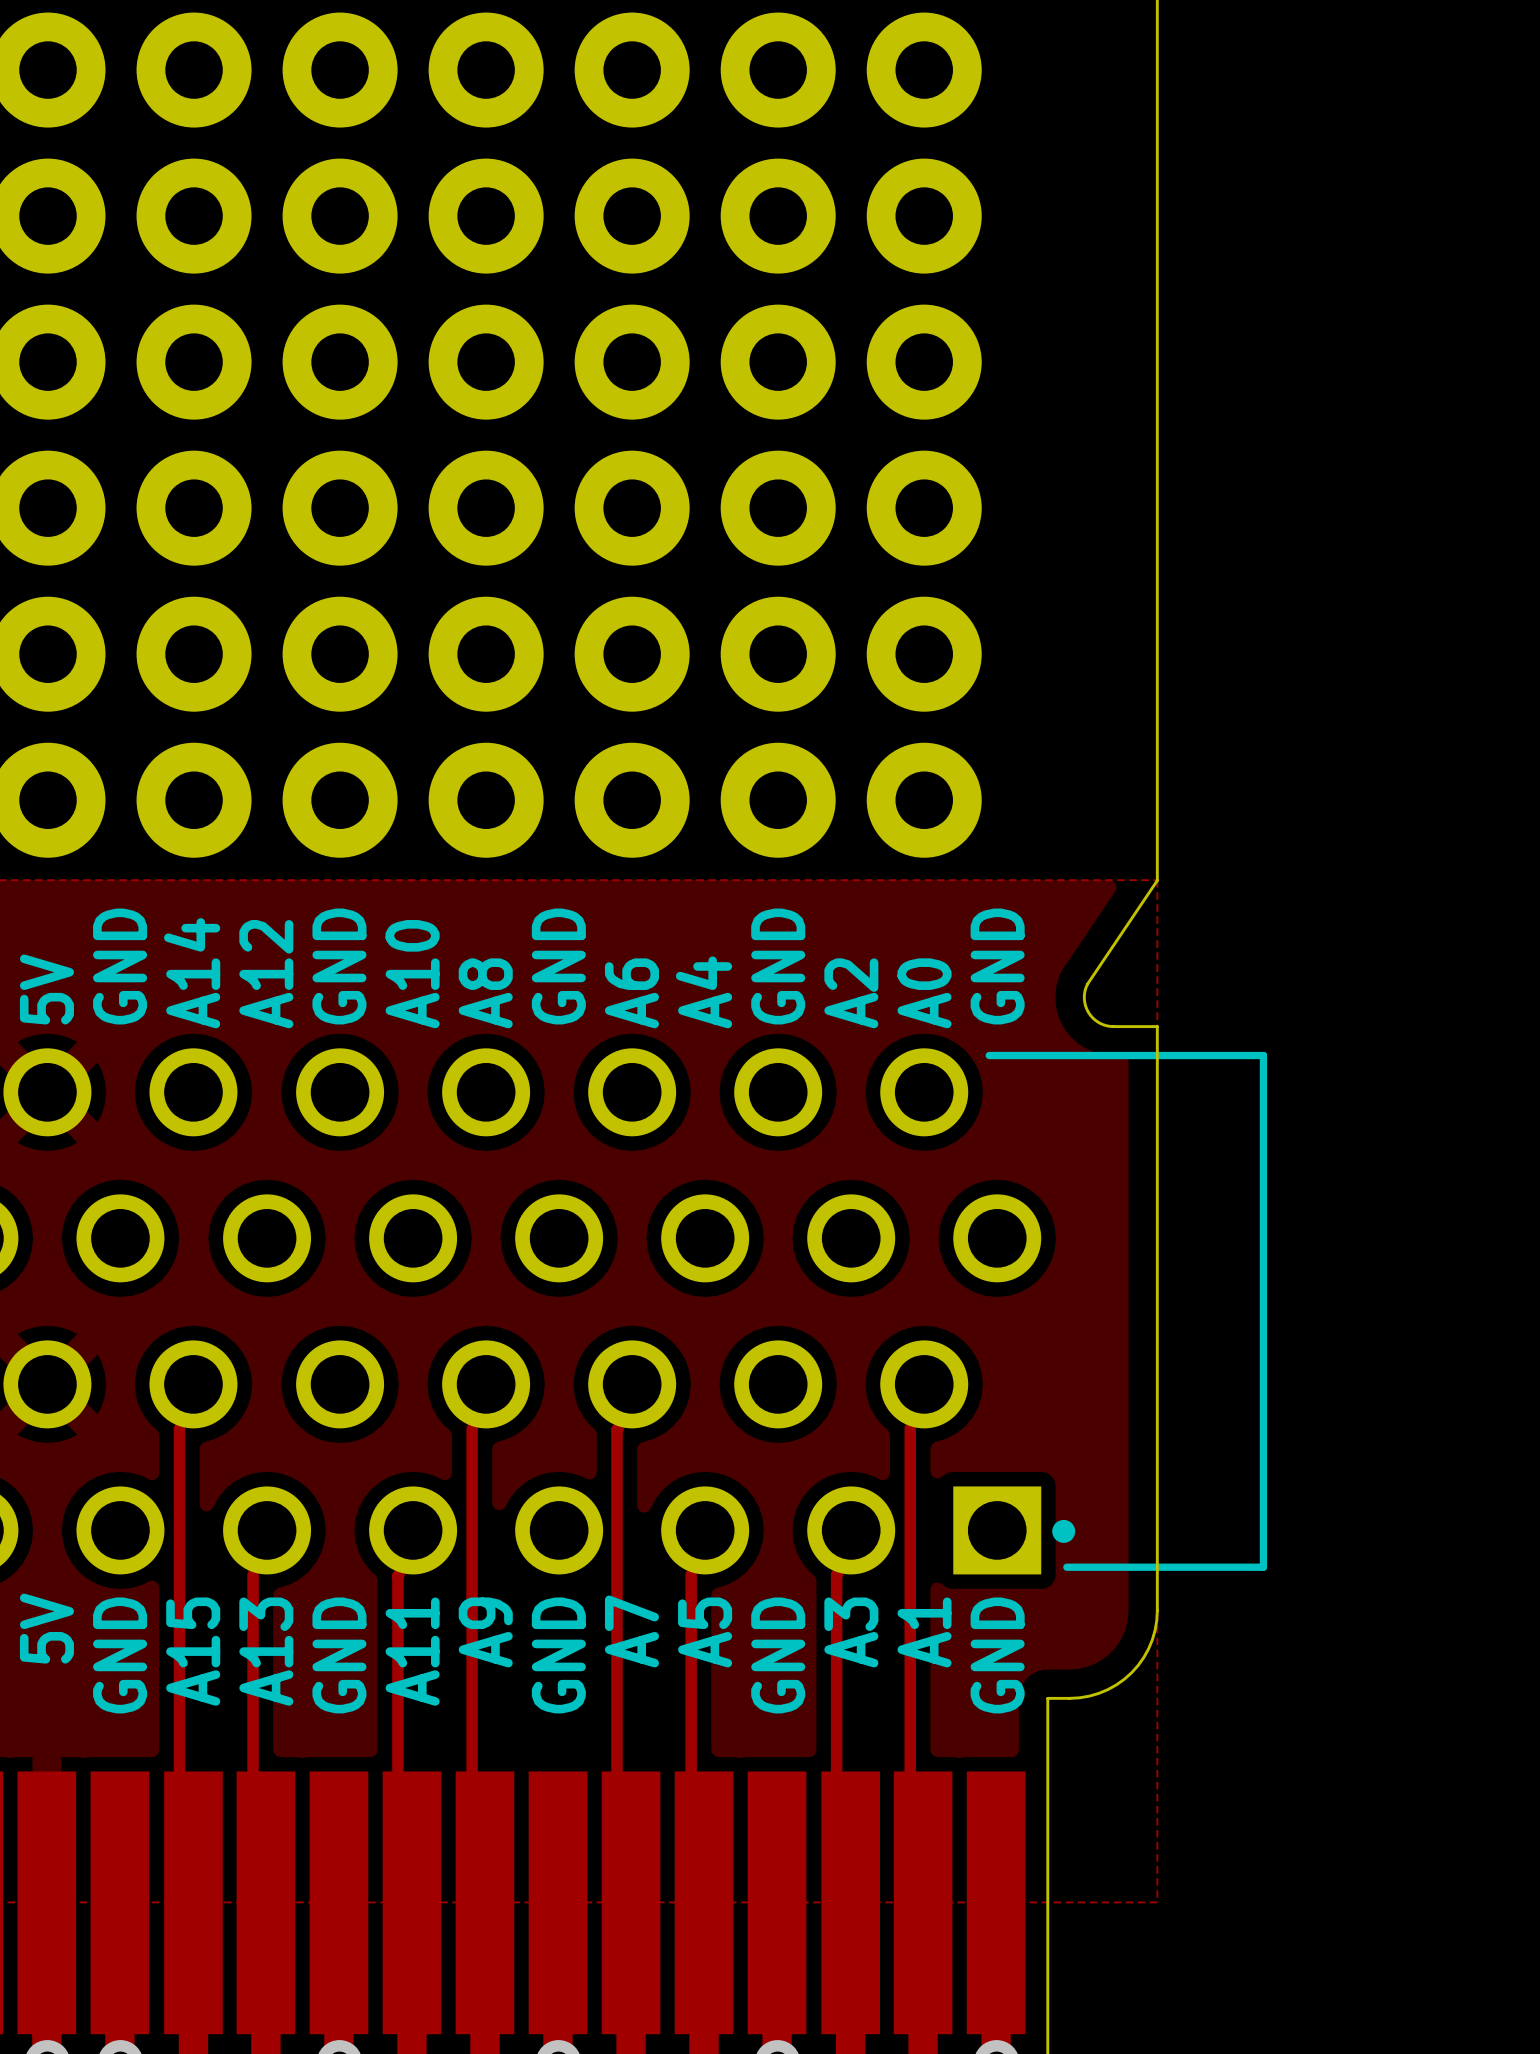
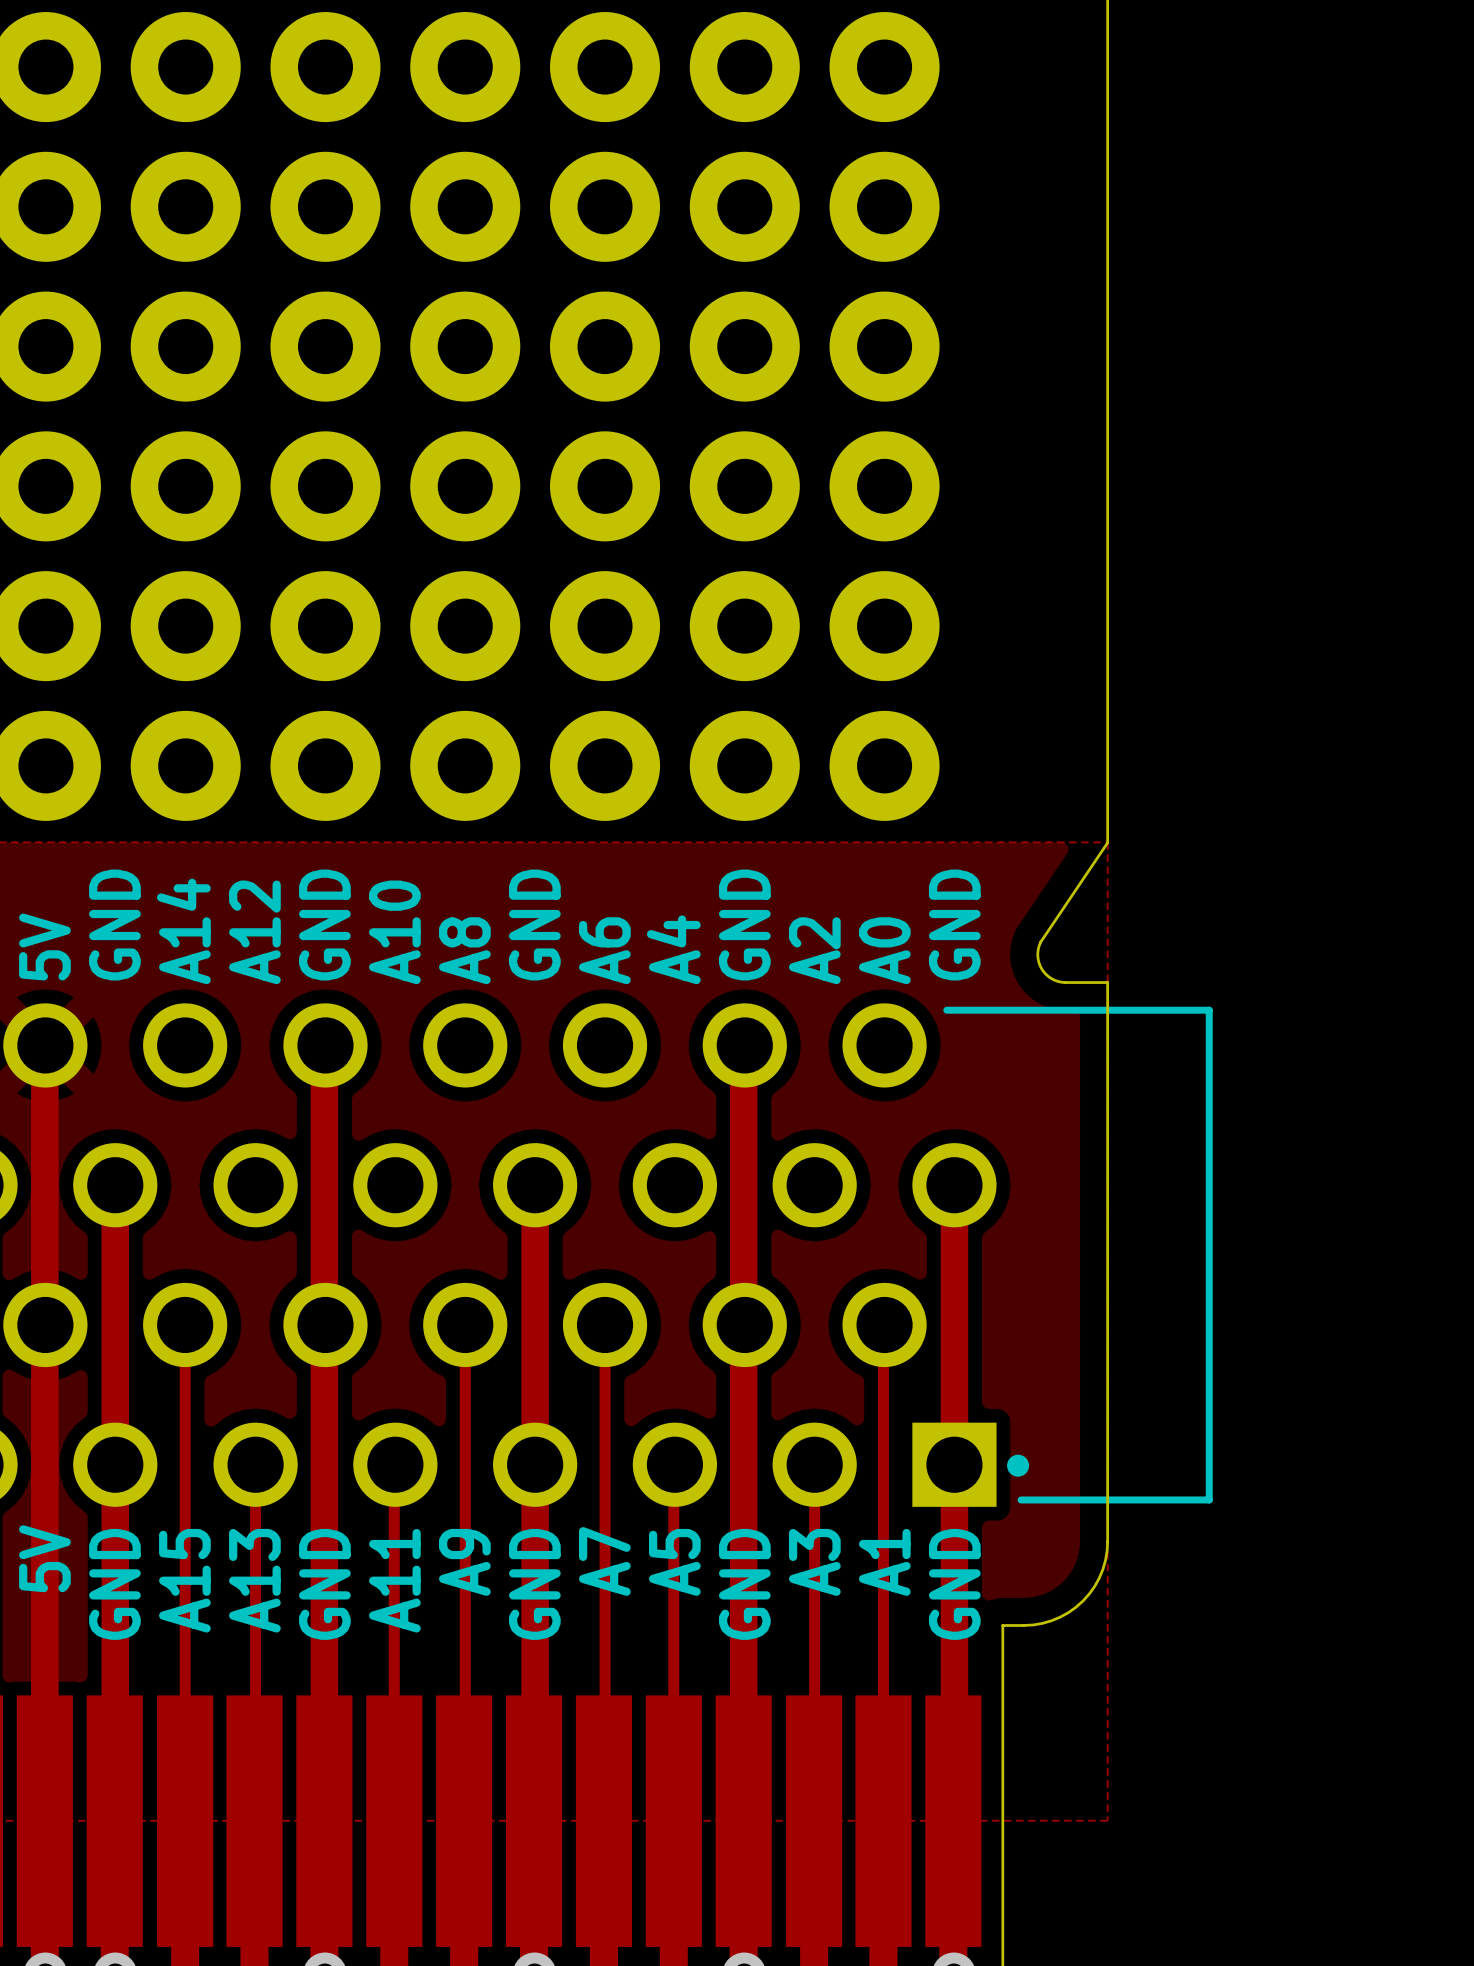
track: none -> (44, 1045) (44, 1821)
track: none -> (325, 1045) (324, 1821)
track: none -> (744, 1045) (743, 1821)
track: none -> (115, 1185) (115, 1820)
track: none -> (535, 1185) (534, 1821)
track: none -> (954, 1185) (953, 1821)
track: (179, 1428) (179, 1947) -> (185, 1324) (185, 1821)
track: (472, 1428) (470, 1947) -> (465, 1324) (464, 1821)
track: (618, 1428) (616, 1947) -> (884, 1324) (883, 1821)
track: (910, 1428) (909, 1947) -> (605, 1324) (603, 1821)
track: none -> (674, 1464) (673, 1821)
track: (253, 1574) (251, 1947) -> (255, 1464) (254, 1821)
track: (399, 1574) (397, 1947) -> (395, 1464) (394, 1821)
track: (691, 1574) (690, 1947) -> none
track: (836, 1575) (836, 1947) -> (814, 1464) (814, 1820)

